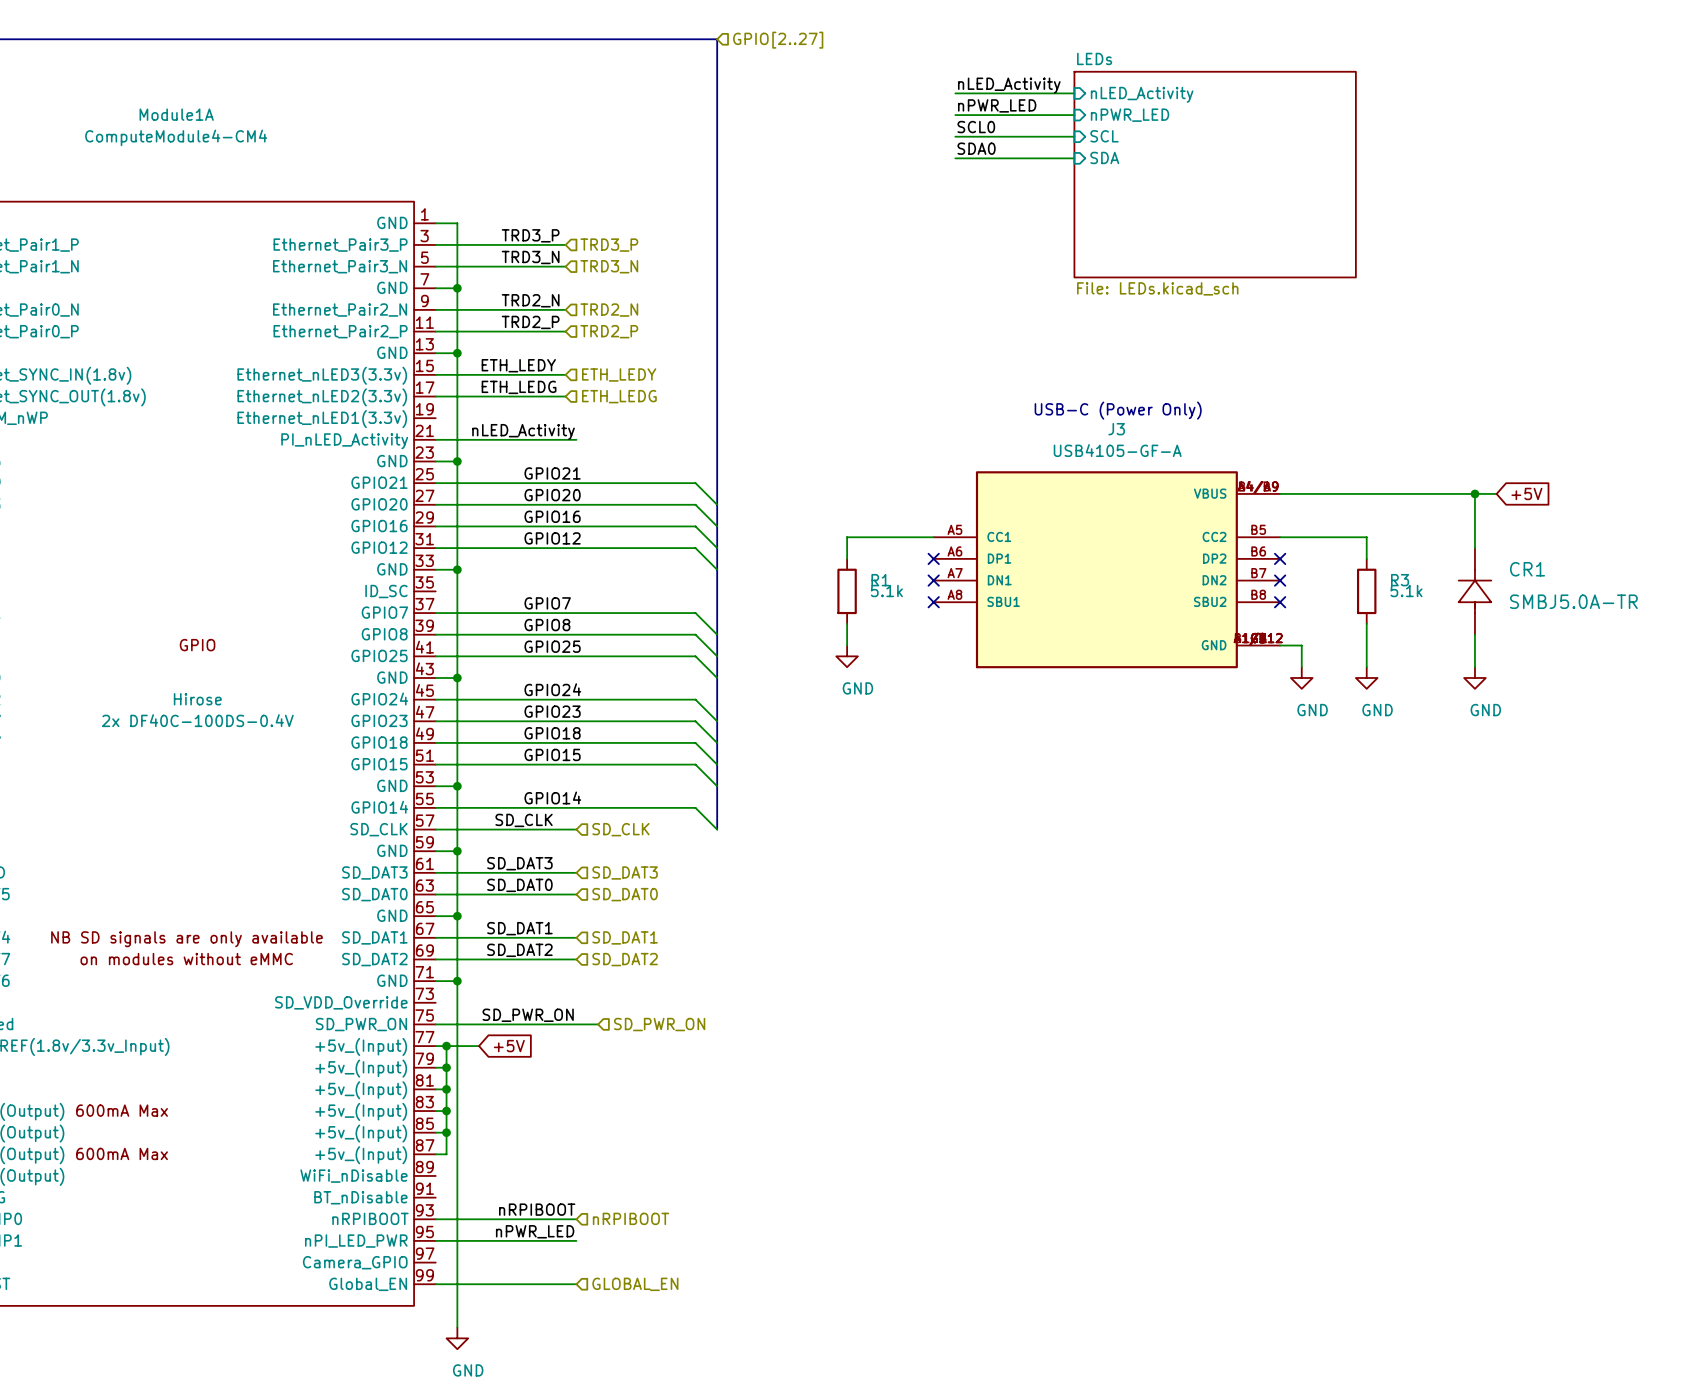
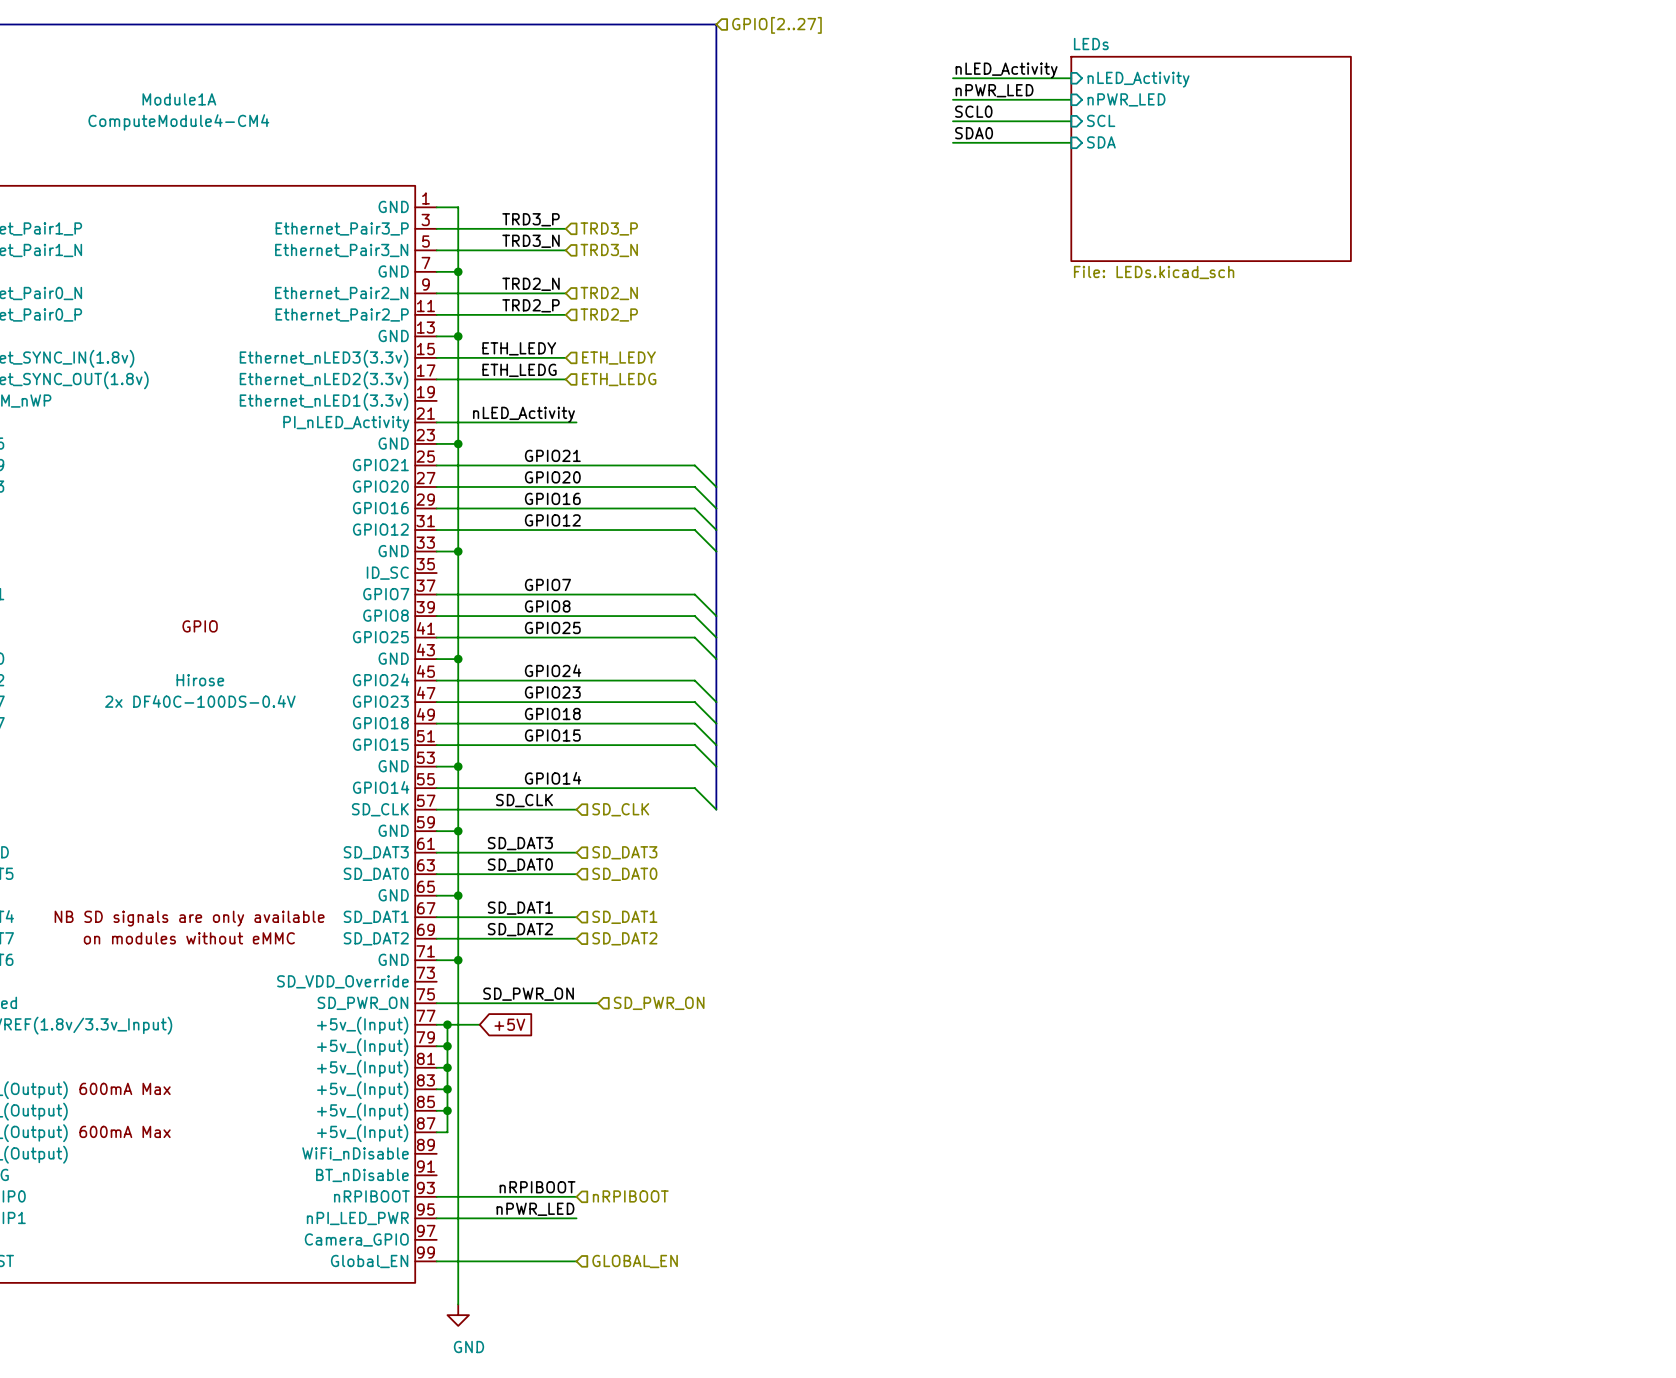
text: USB-C (Power Only) (1118, 410) -> none
wire: (1280, 493) (1496, 493) -> none
wire: (1474, 493) (1474, 548) -> none
junction: (1474, 493) -> none
global label: +5V (1526, 493) -> none
wire: (933, 537) (847, 537) (847, 558) -> none
wire: (1280, 537) (1366, 537) (1366, 558) -> none
no-connect mark: (933, 558) -> none
no-connect mark: (1280, 558) -> none
J3: USB4105-GF-A (1106, 569) -> none
no-connect mark: (933, 580) -> none
no-connect mark: (1280, 580) -> none
R1: 5.1k (847, 591) -> none
R3: 5.1k (1366, 591) -> none
CR1: SMBJ5.0A-TR (1474, 591) -> none
no-connect mark: (933, 602) -> none
no-connect mark: (1280, 602) -> none
wire: (847, 623) (847, 645) -> none
wire: (1366, 623) (1366, 667) -> none
wire: (1474, 634) (1474, 667) -> none
wire: (1280, 645) (1301, 645) (1301, 667) -> none
power symbol: GND (847, 656) -> none
power symbol: GND (1301, 678) -> none
power symbol: GND (1366, 678) -> none
power symbol: GND (1474, 678) -> none

